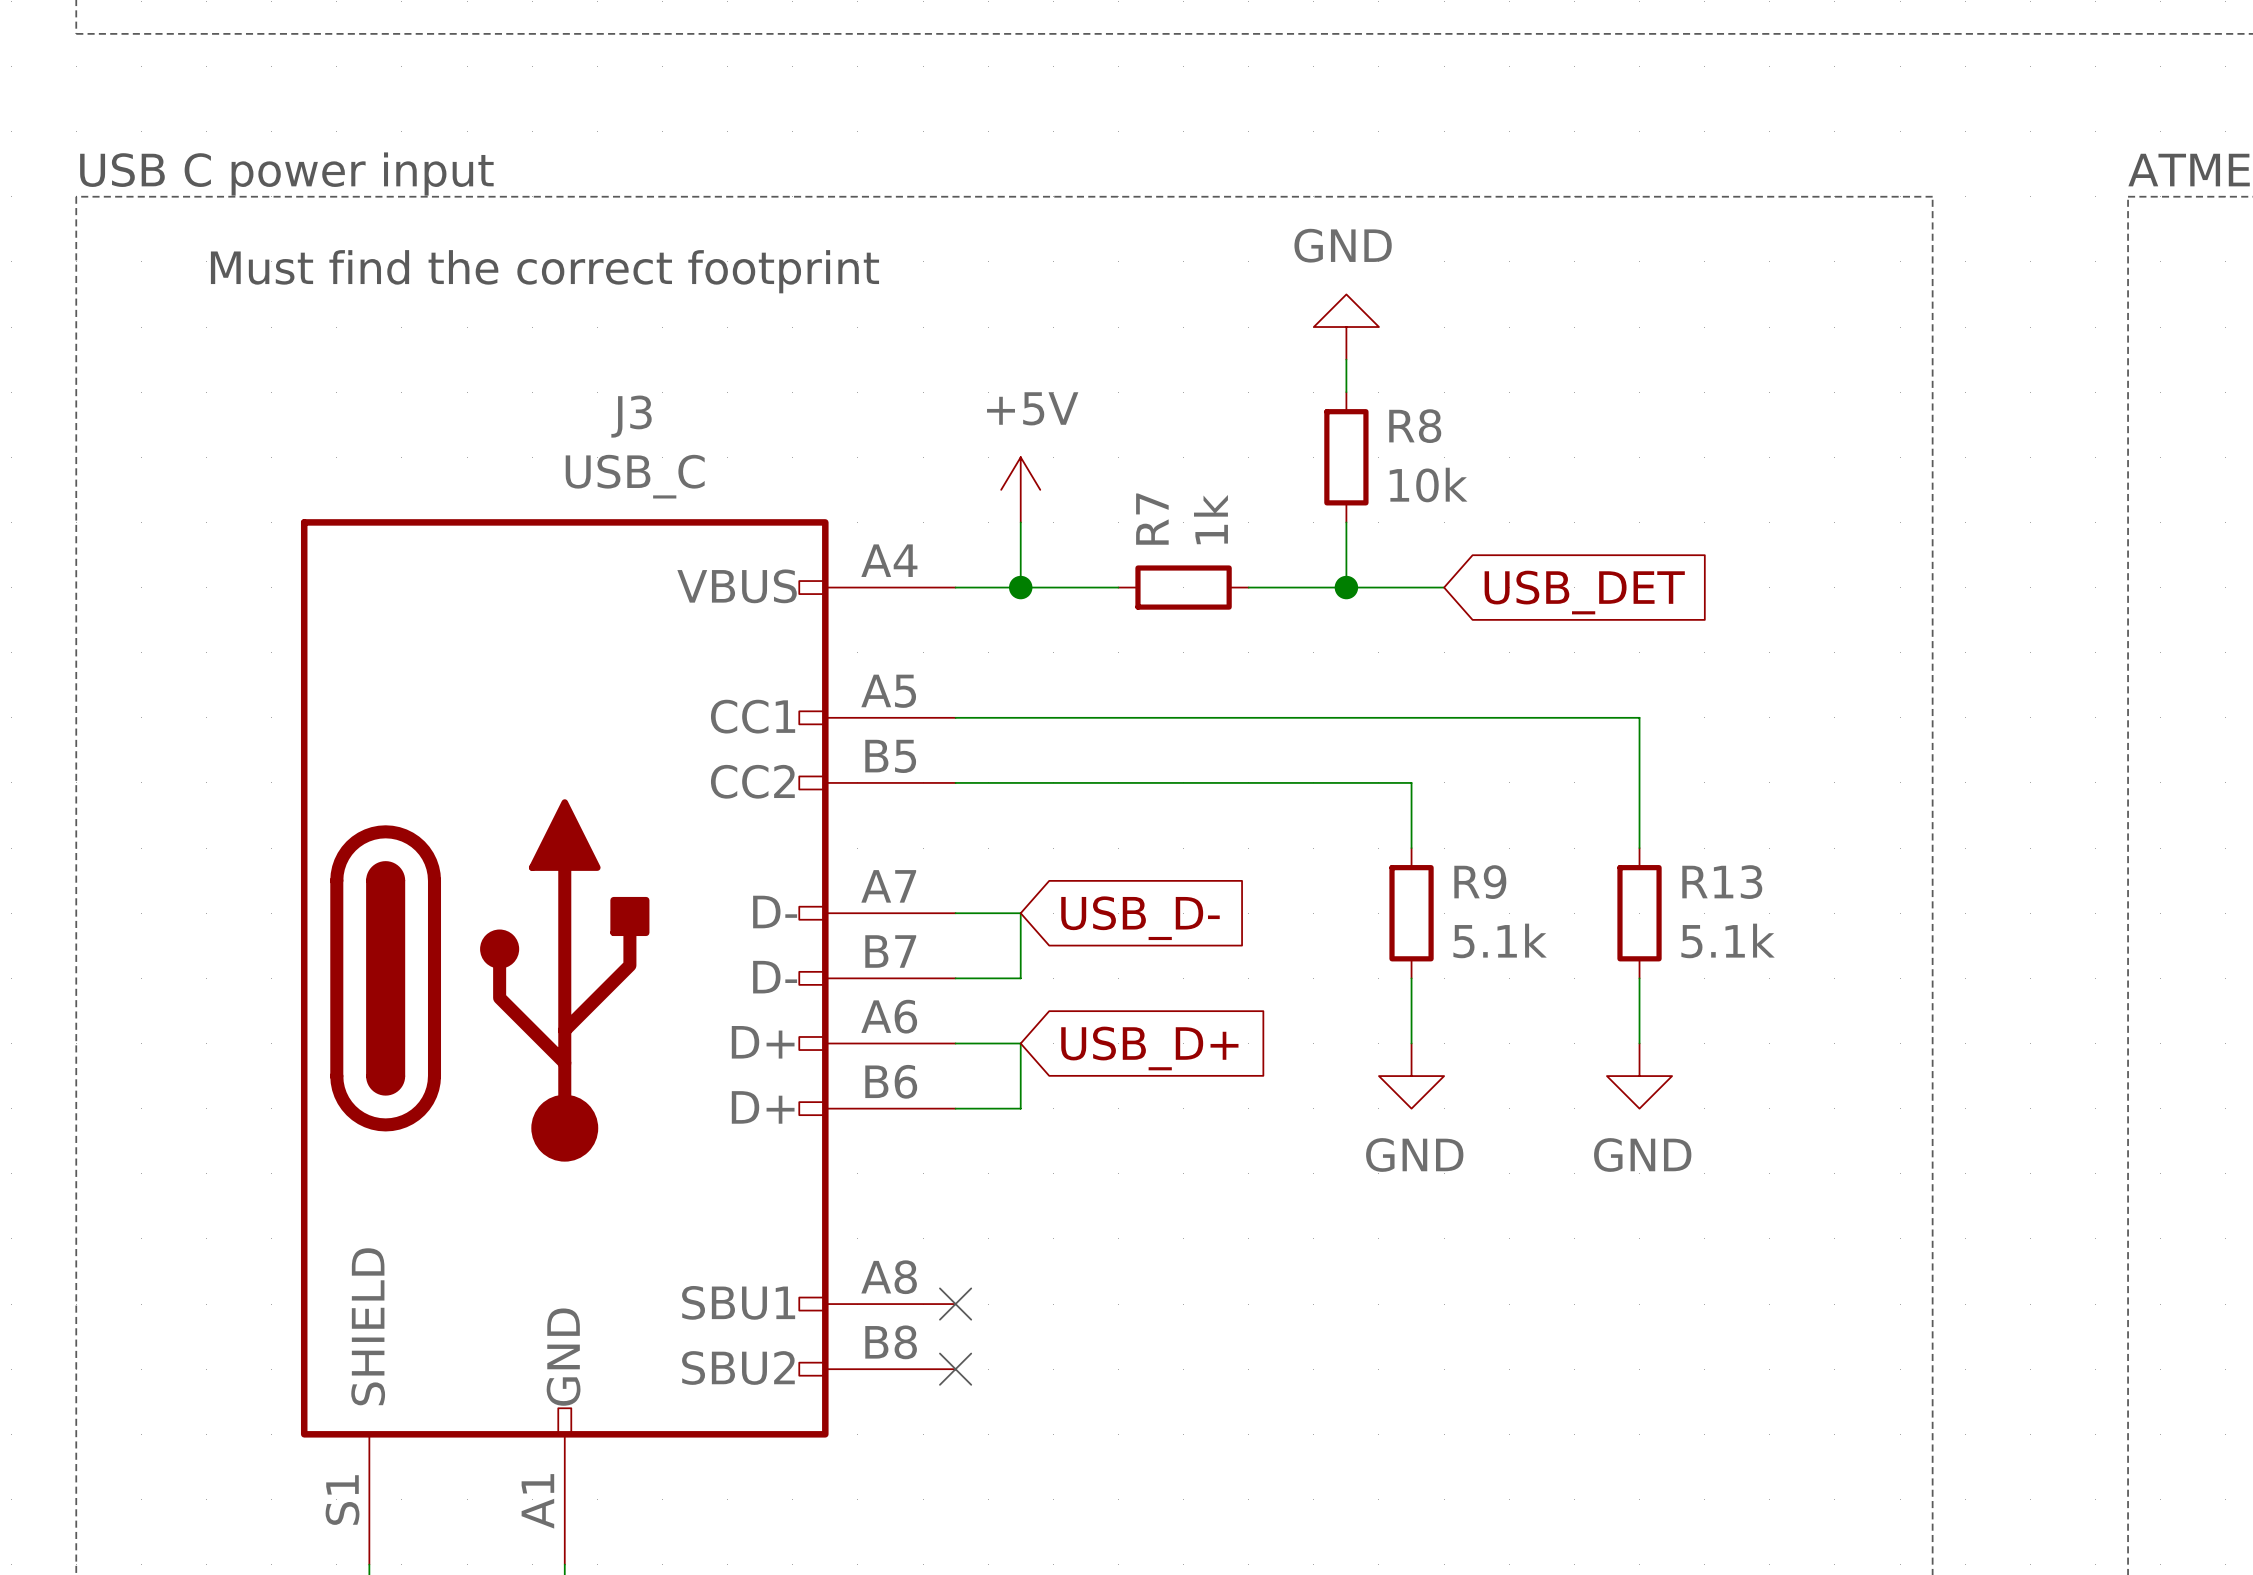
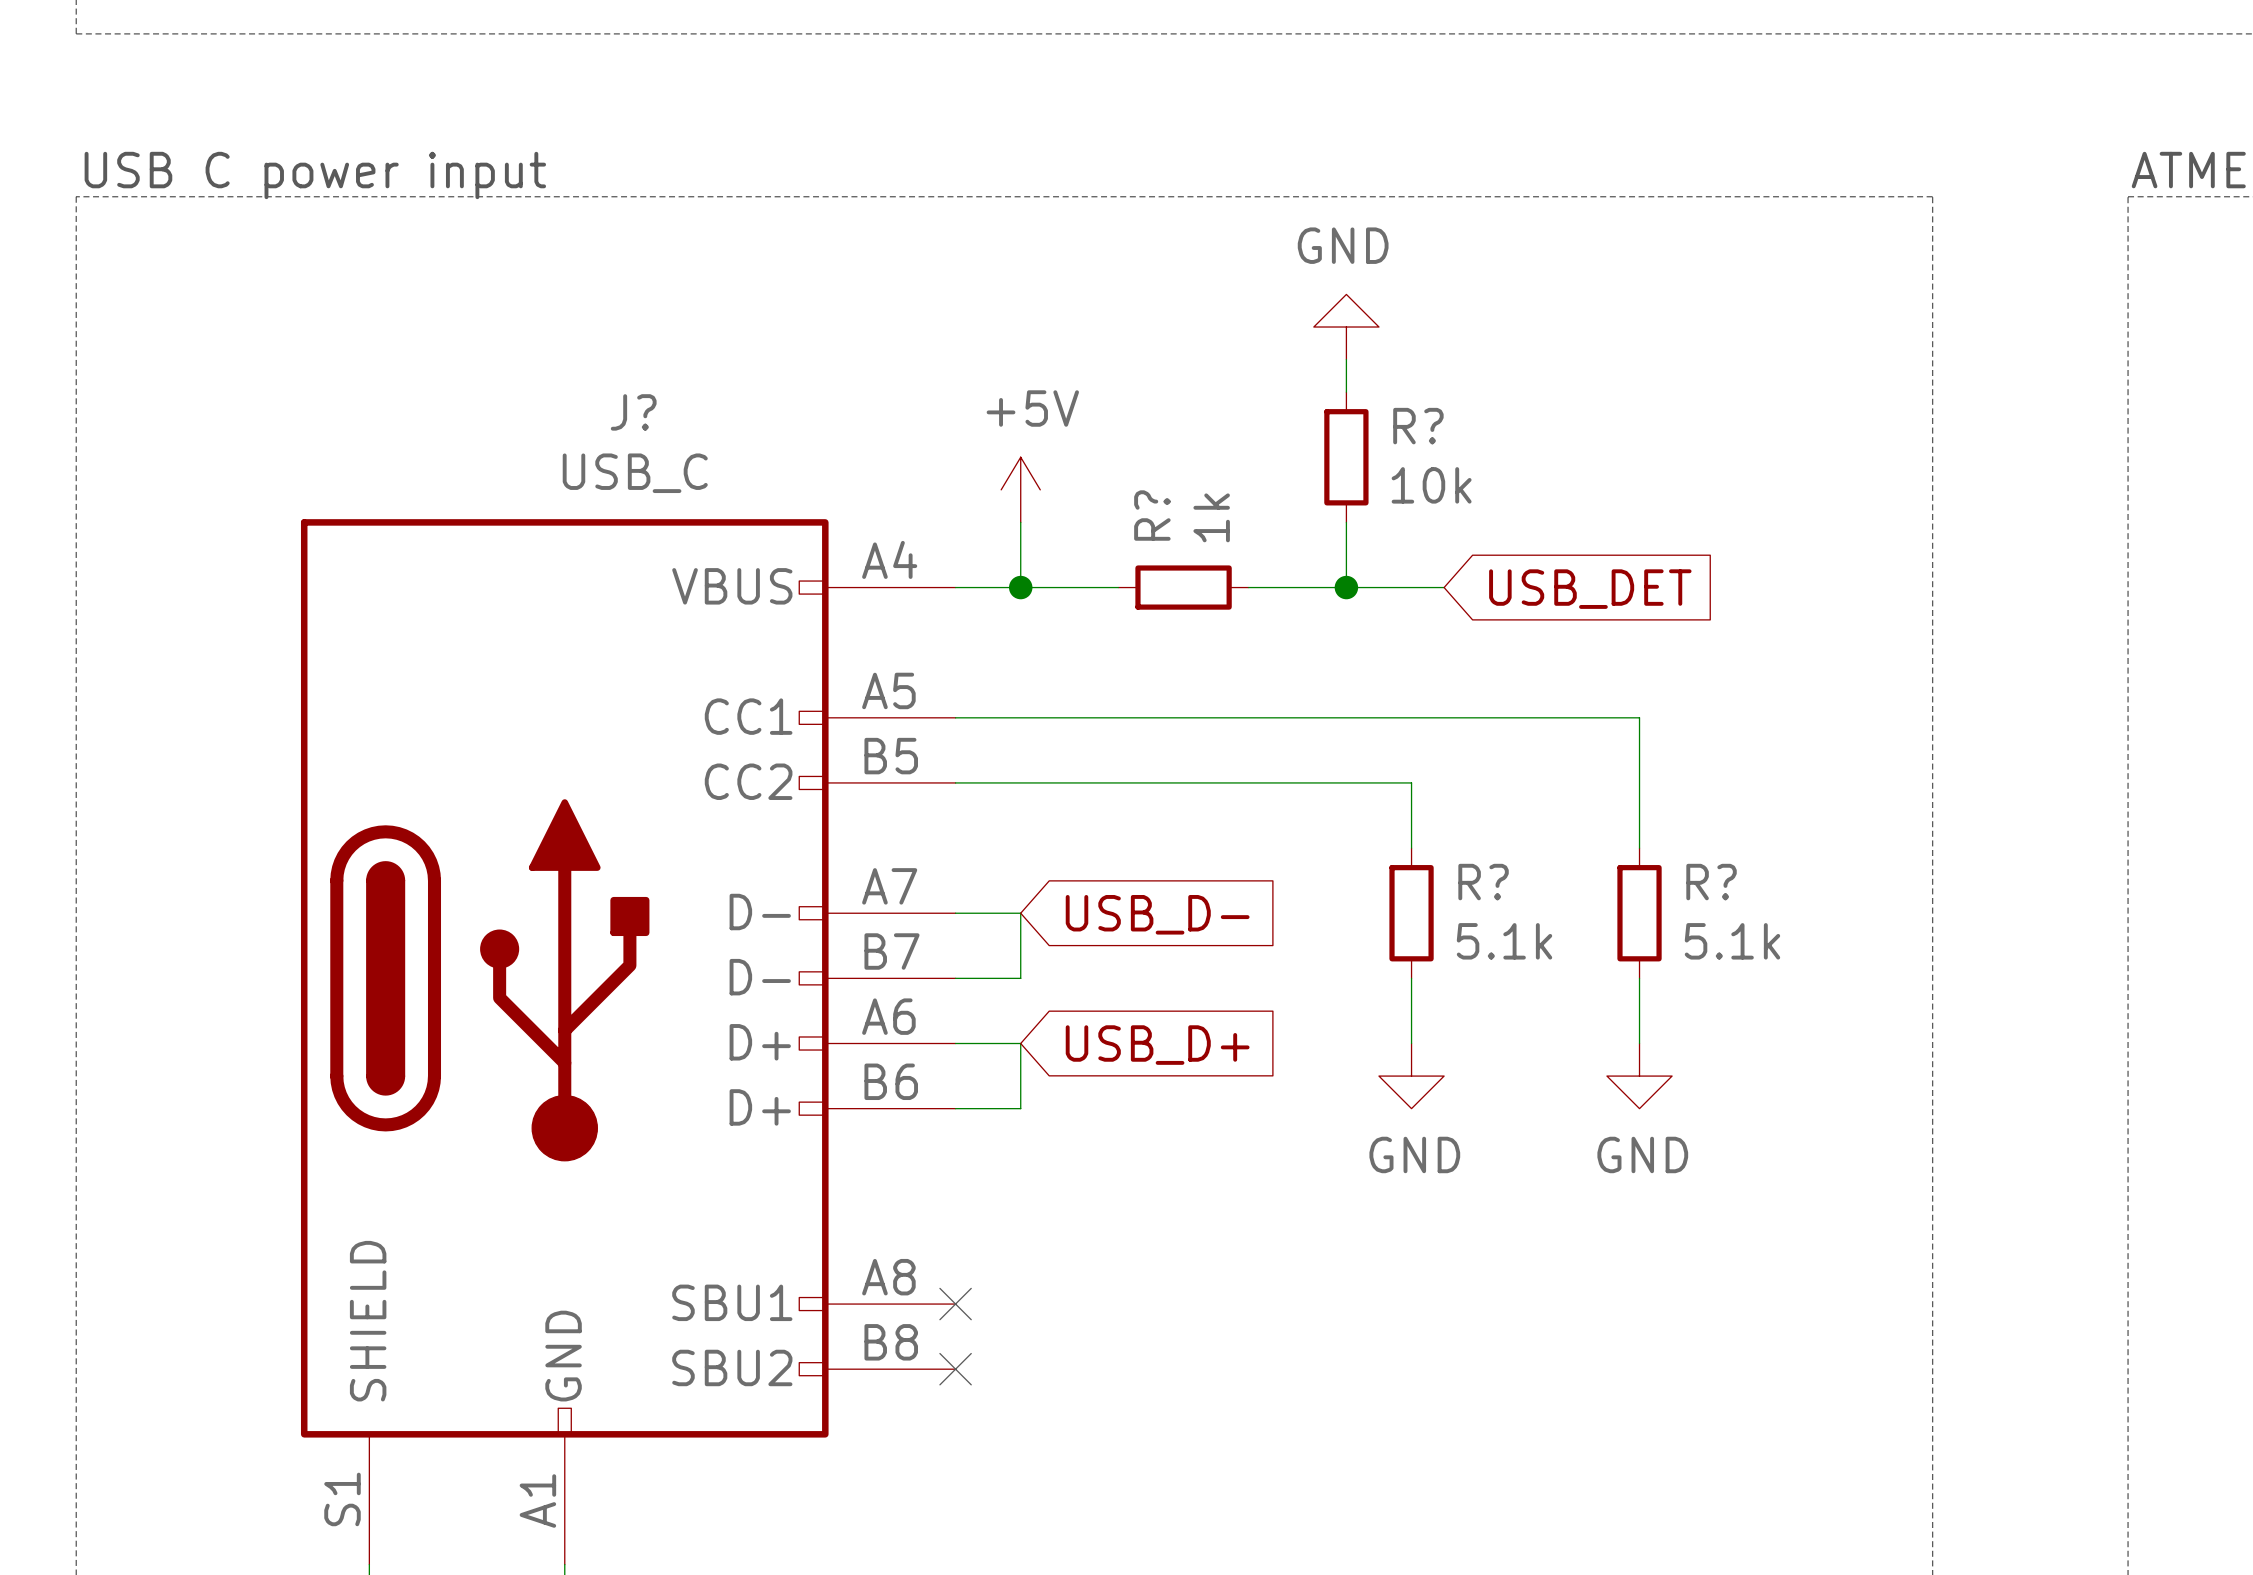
text: Must find the correct footprint (544, 271) -> none
J3 name: J3 (631, 416) -> J? (633, 412)
R8 name: R8 (1415, 426) -> R? (1418, 426)
R7 name: R7 (1152, 519) -> R? (1152, 515)
R9 name: R9 (1480, 882) -> R? (1483, 882)
R13 name: R13 (1722, 882) -> R? (1711, 882)

